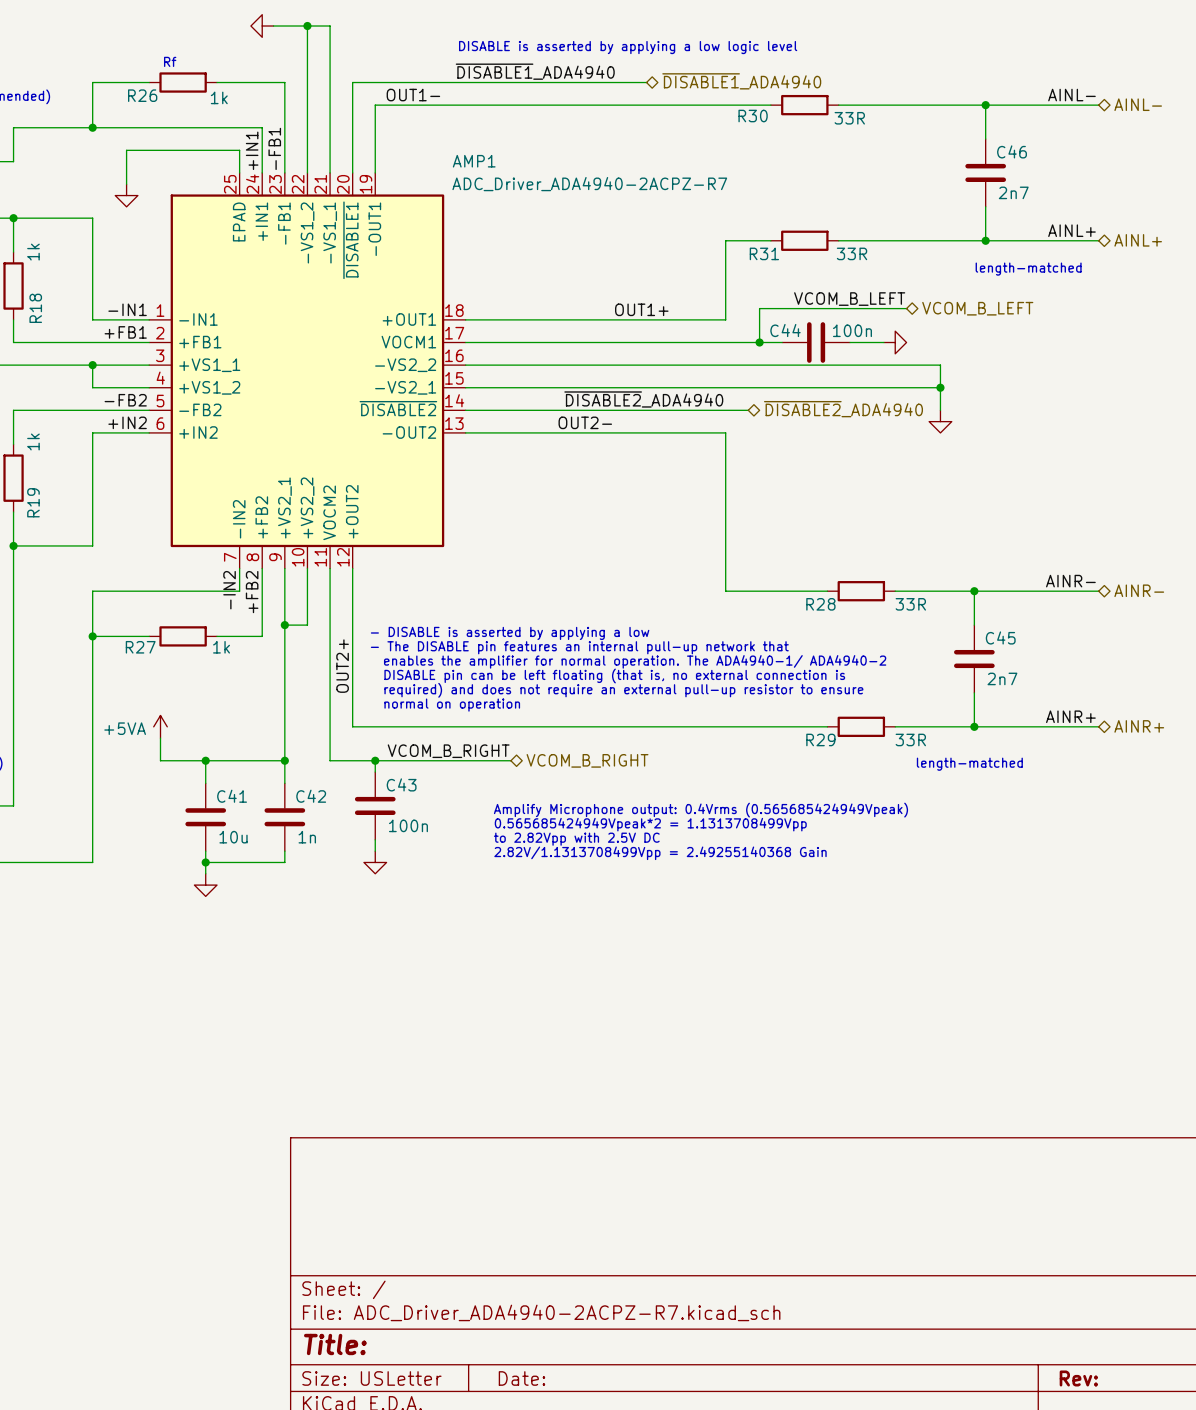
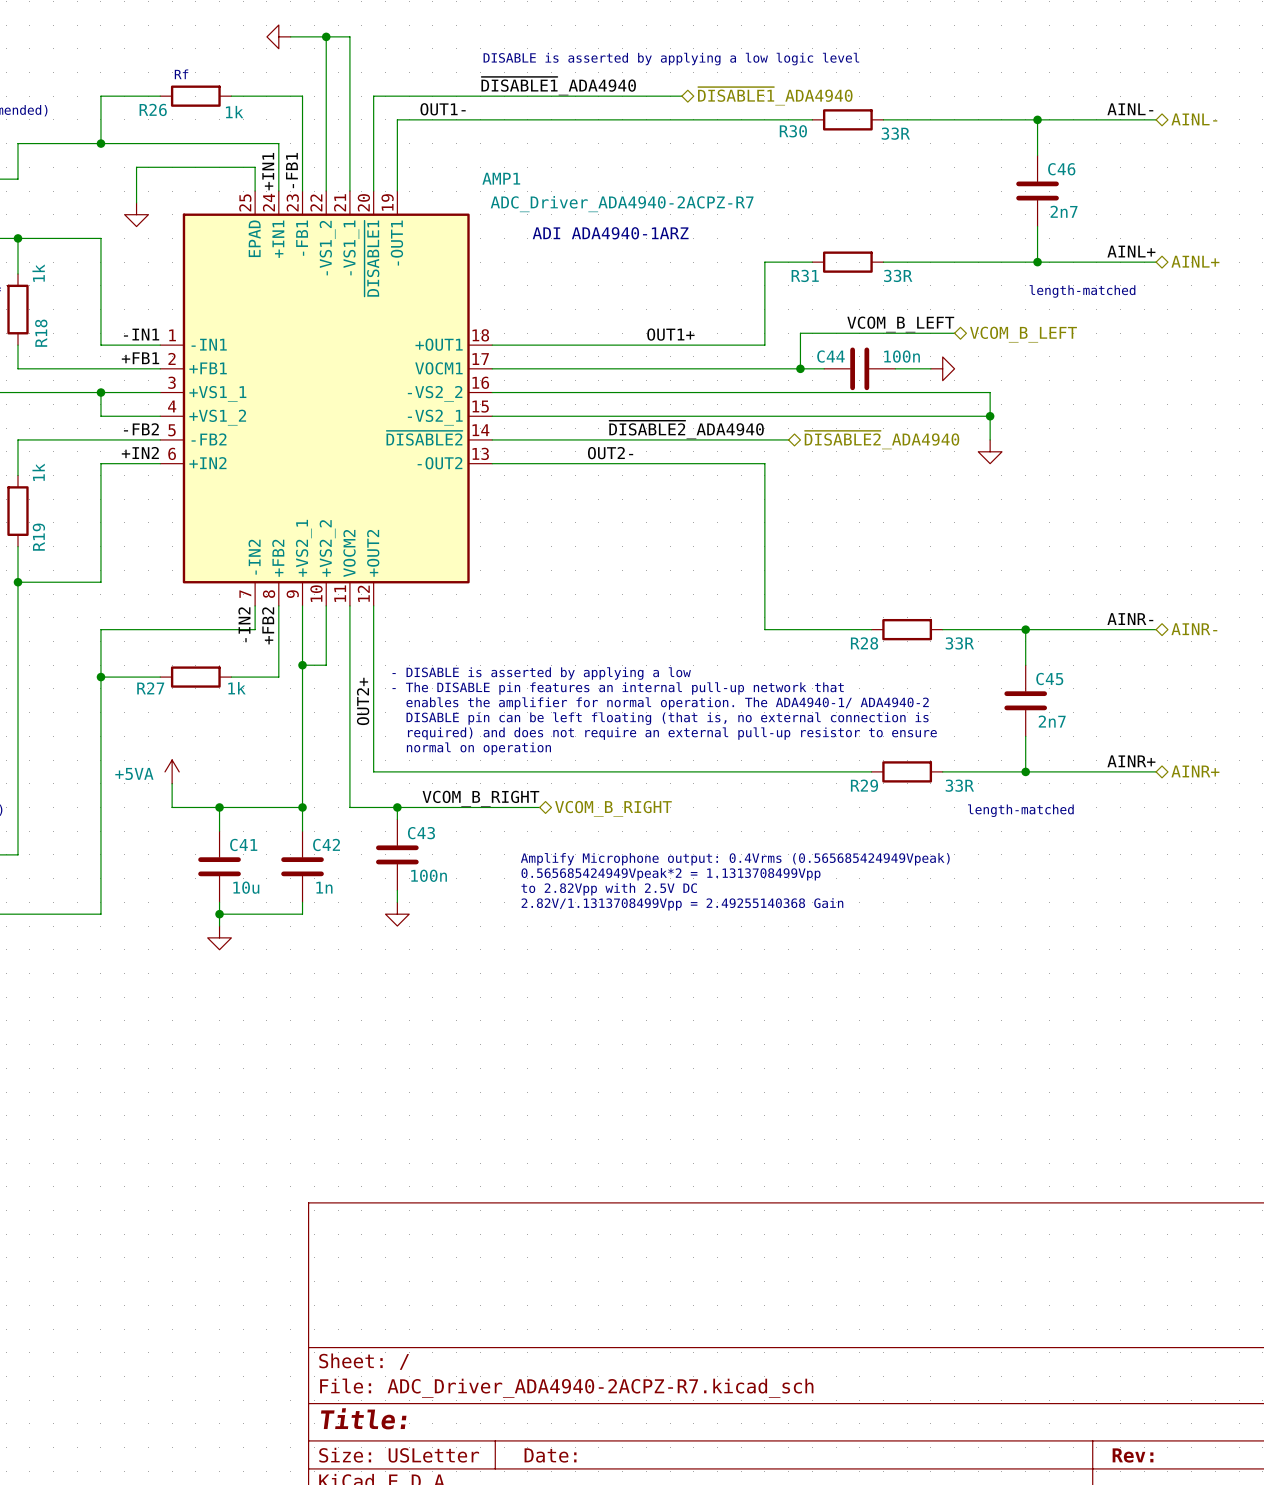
text: none -> ADI ADA4940-1ARZ (610, 233)

